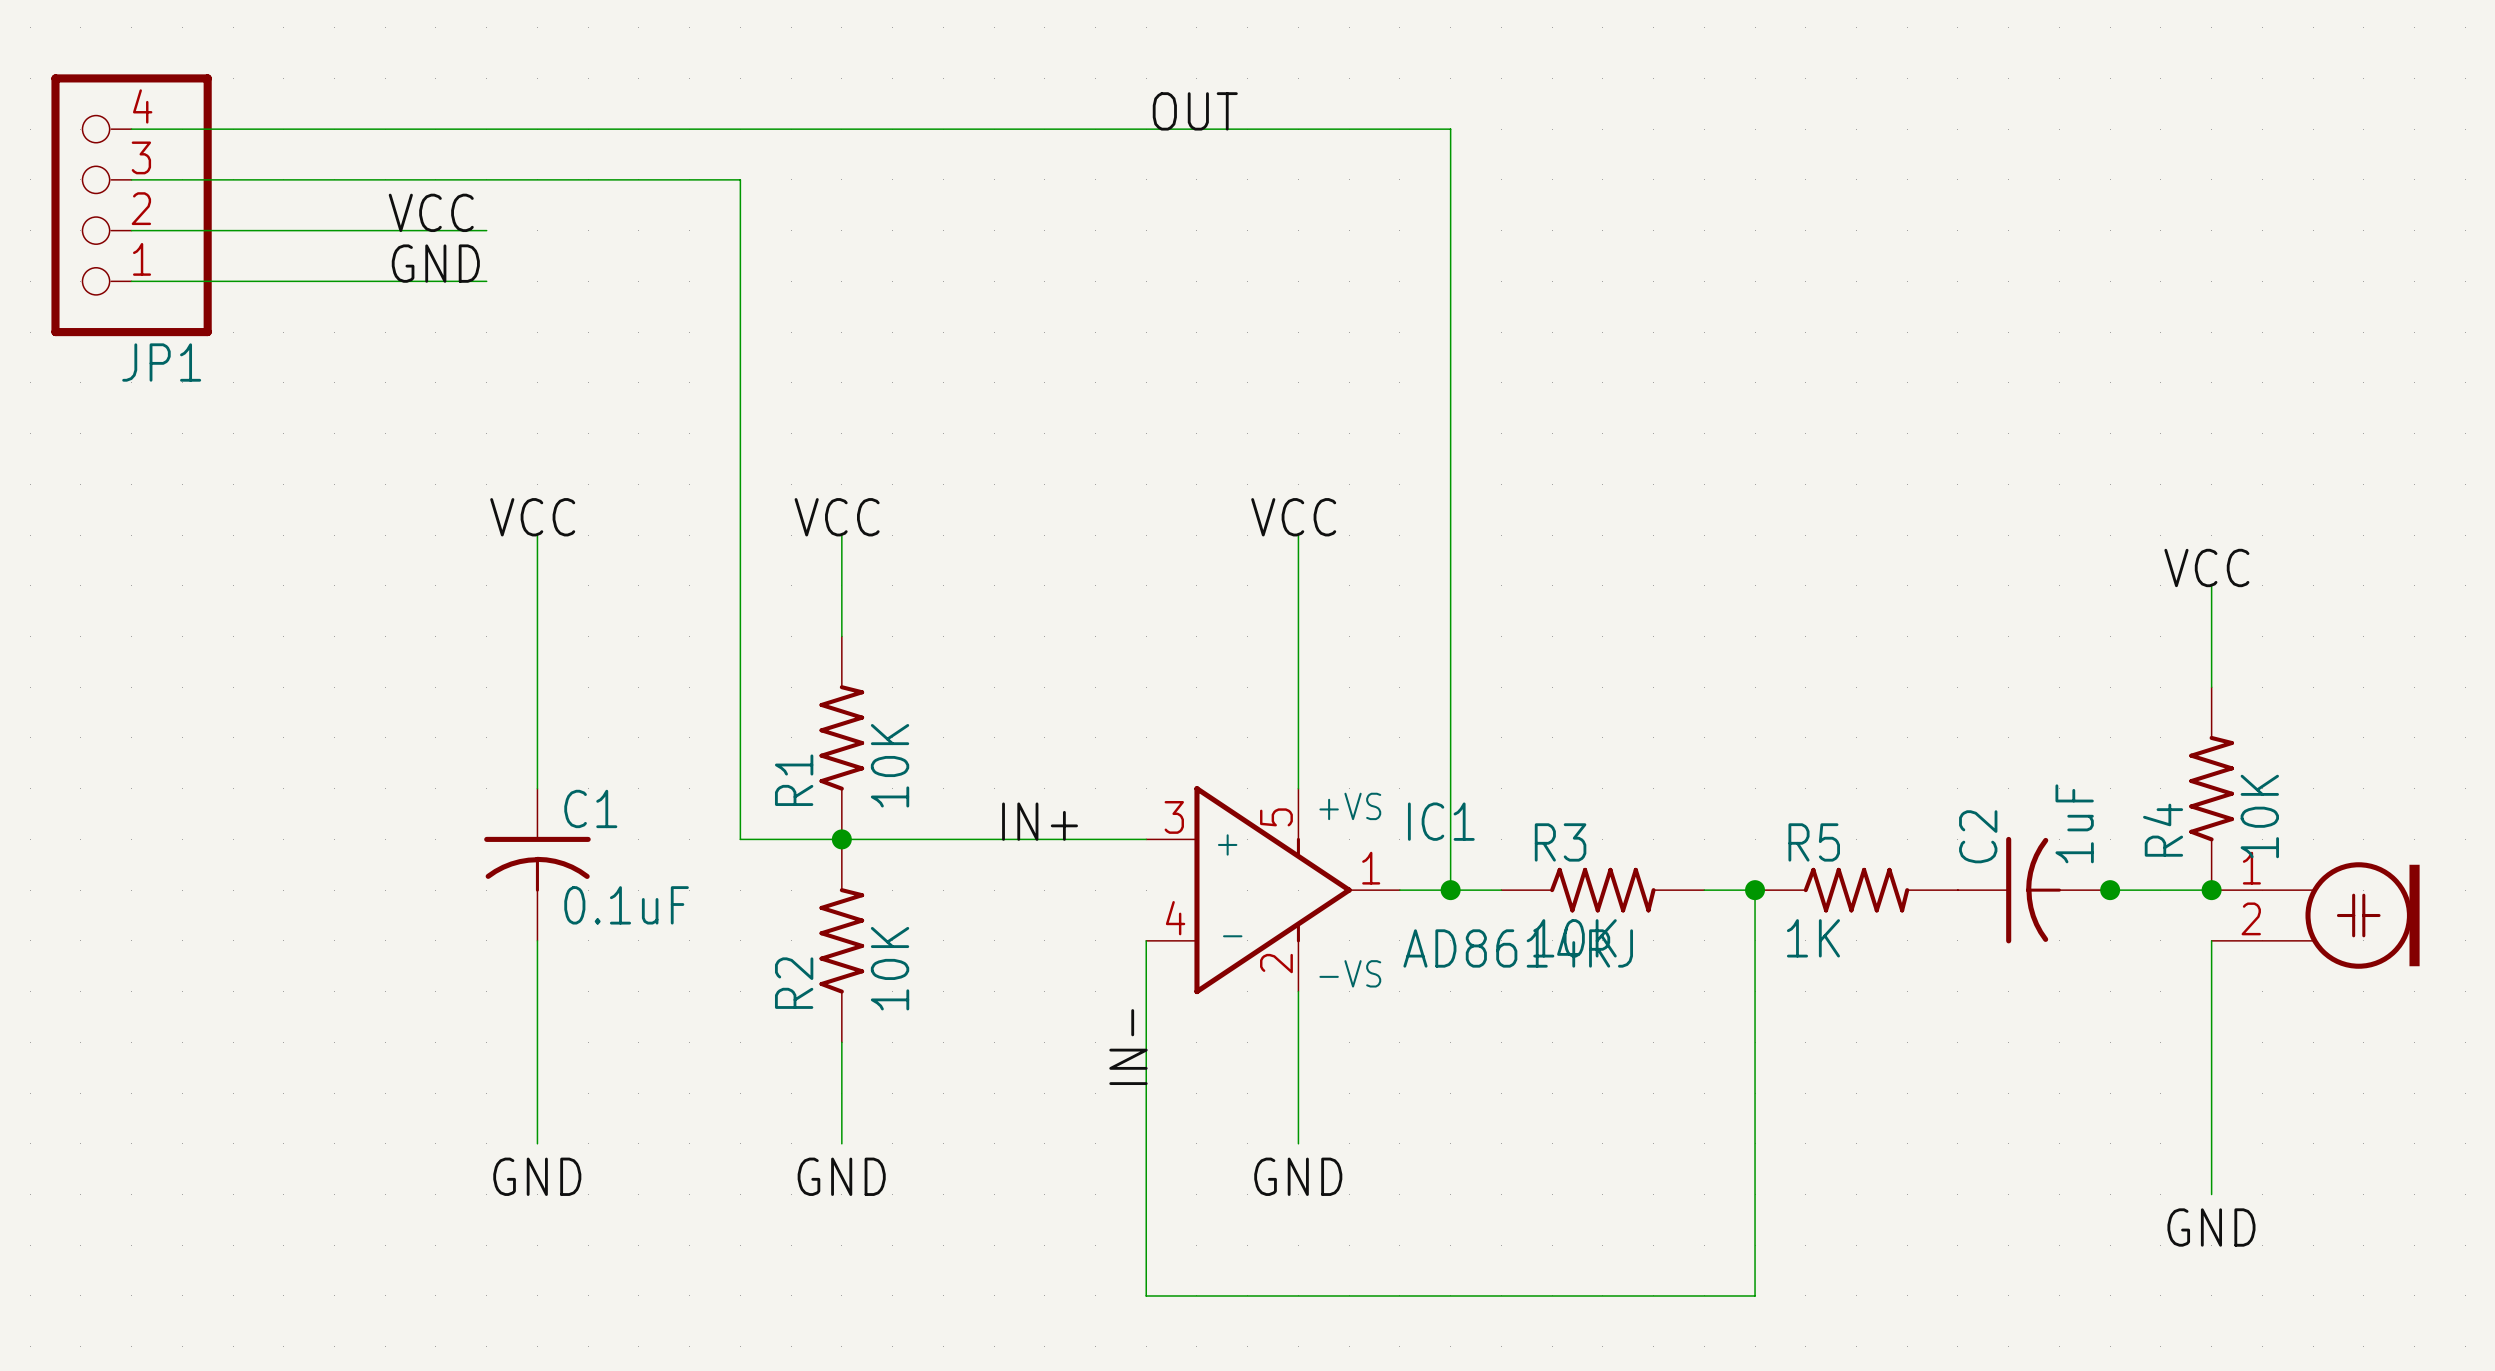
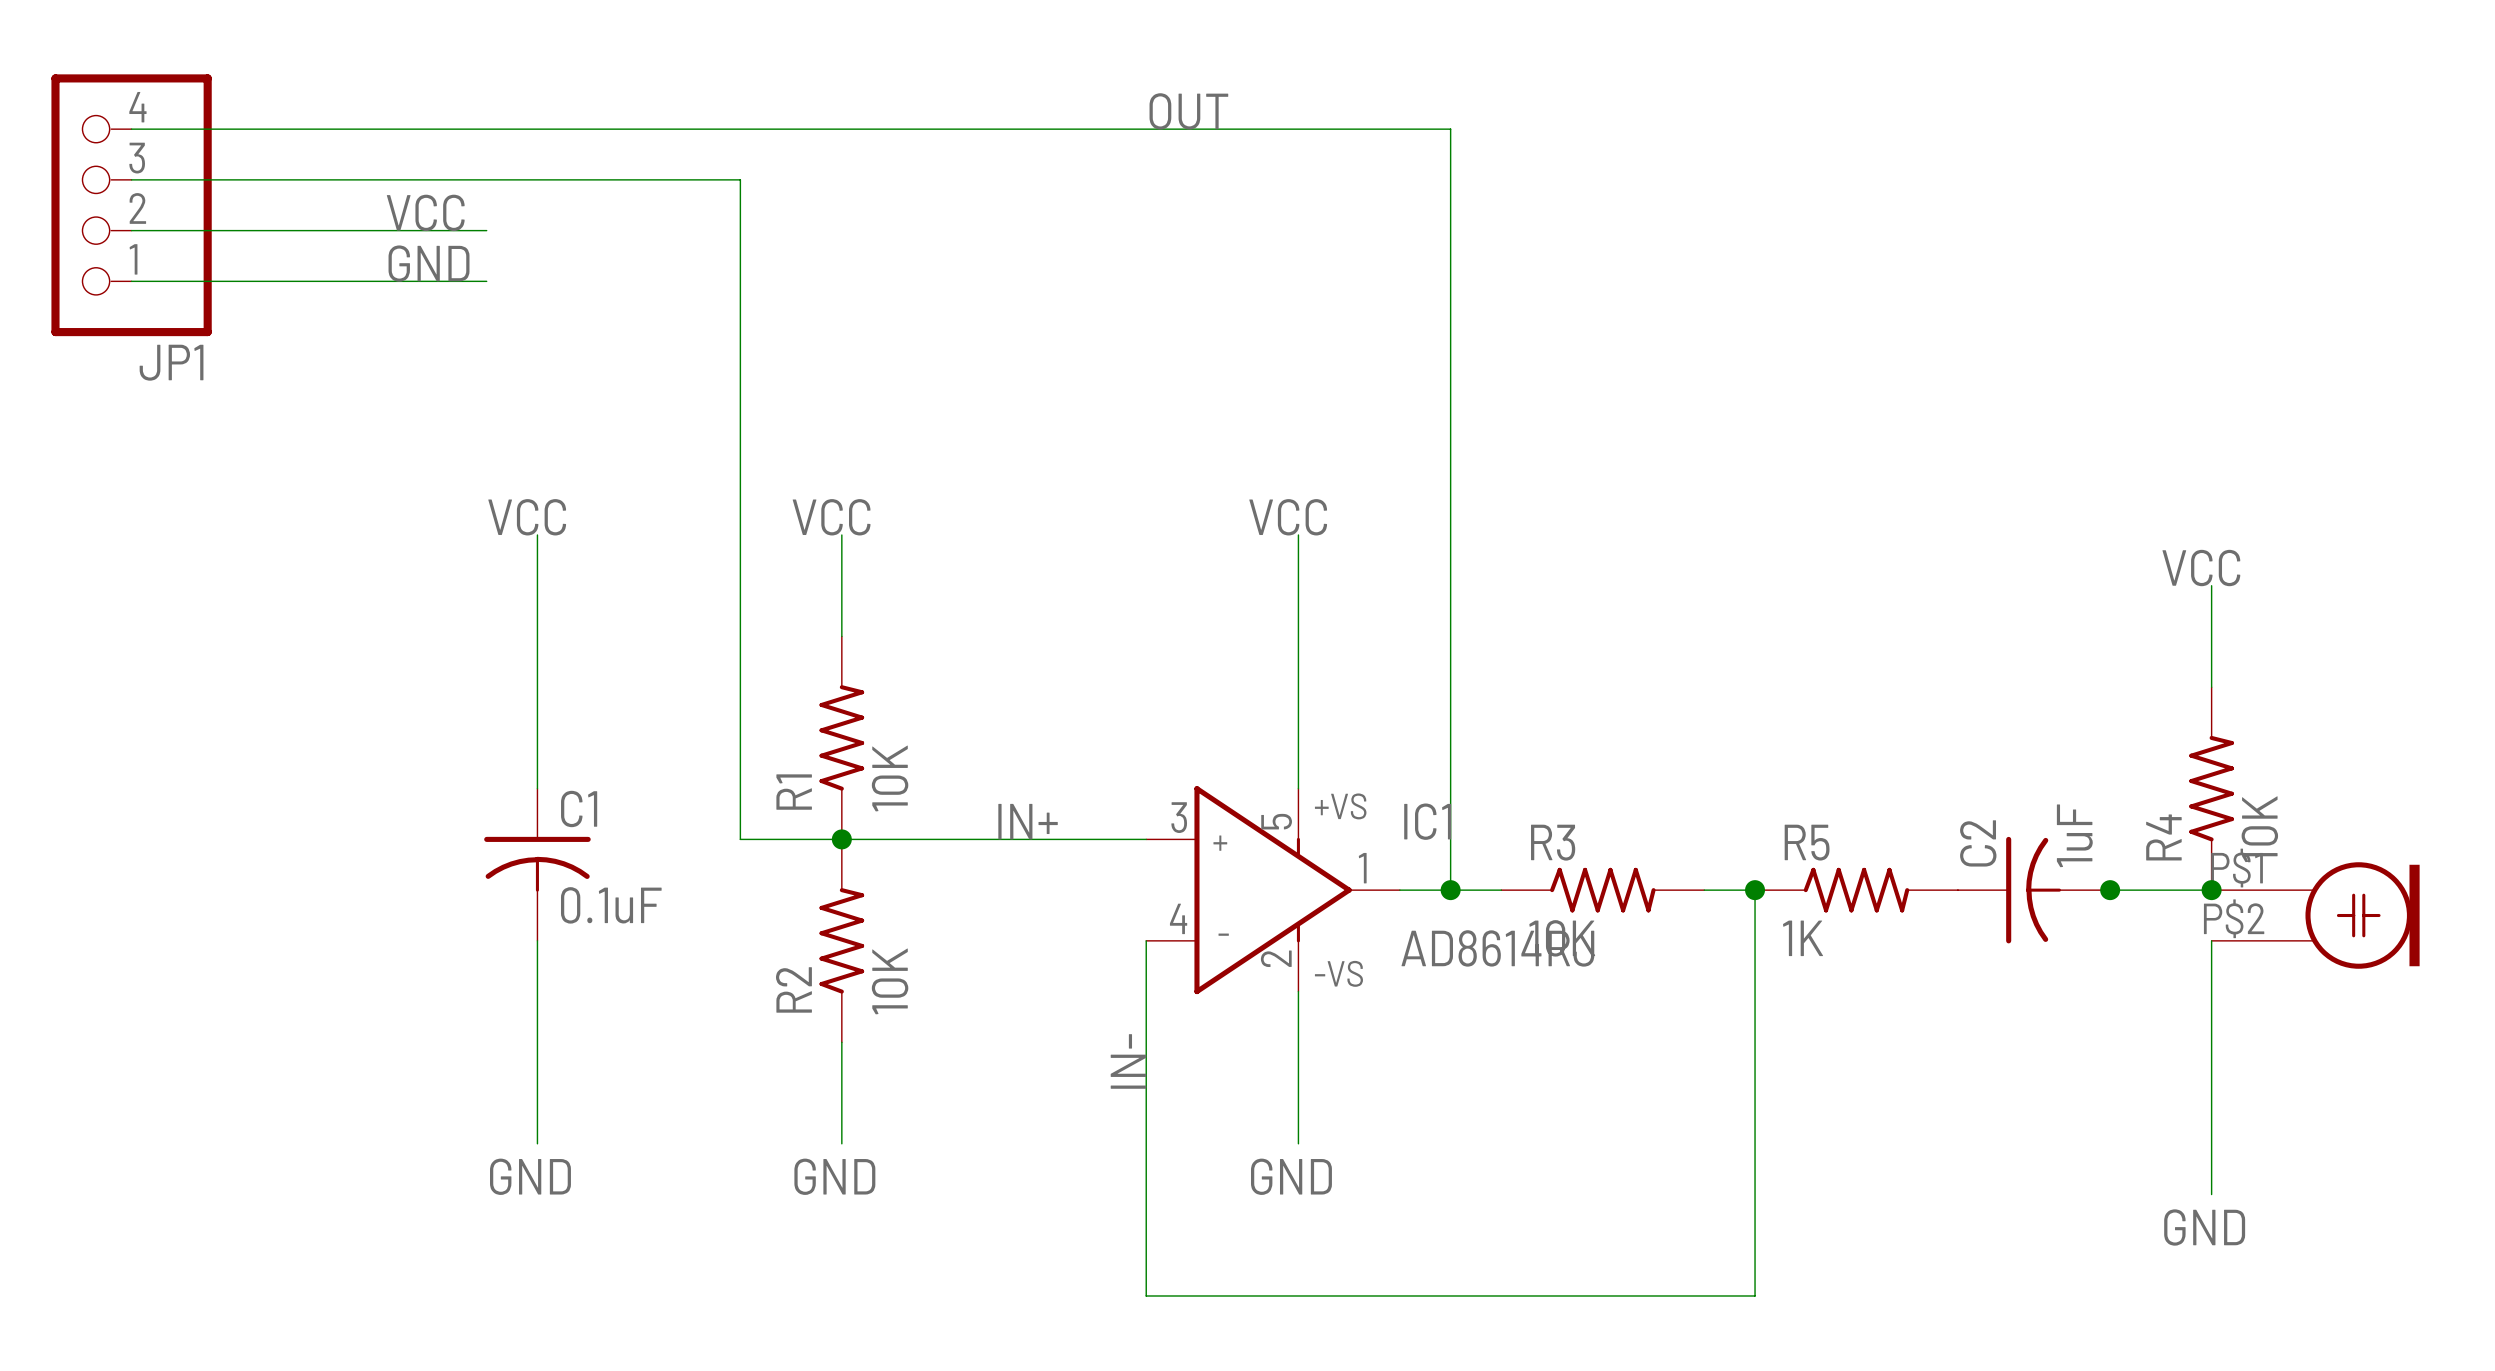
part pin number: 1 (2251, 868) -> P$1 (2237, 868)
part pin number: 2 (2251, 918) -> P$2 (2234, 918)

